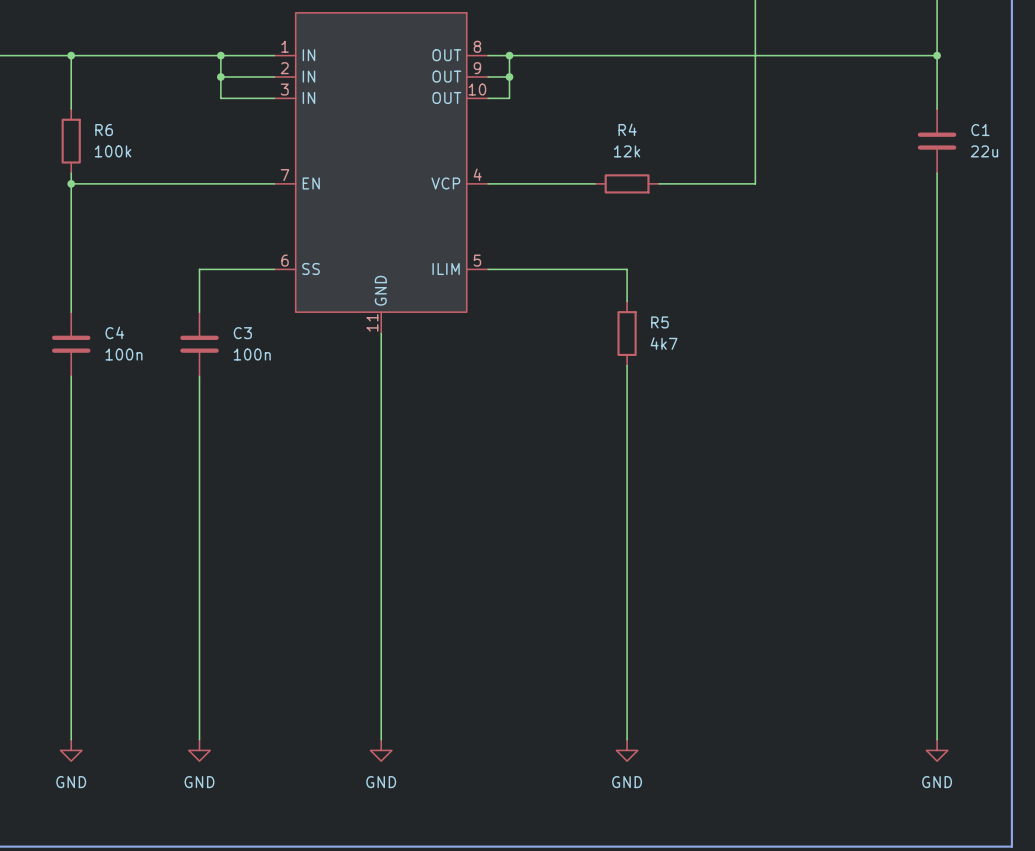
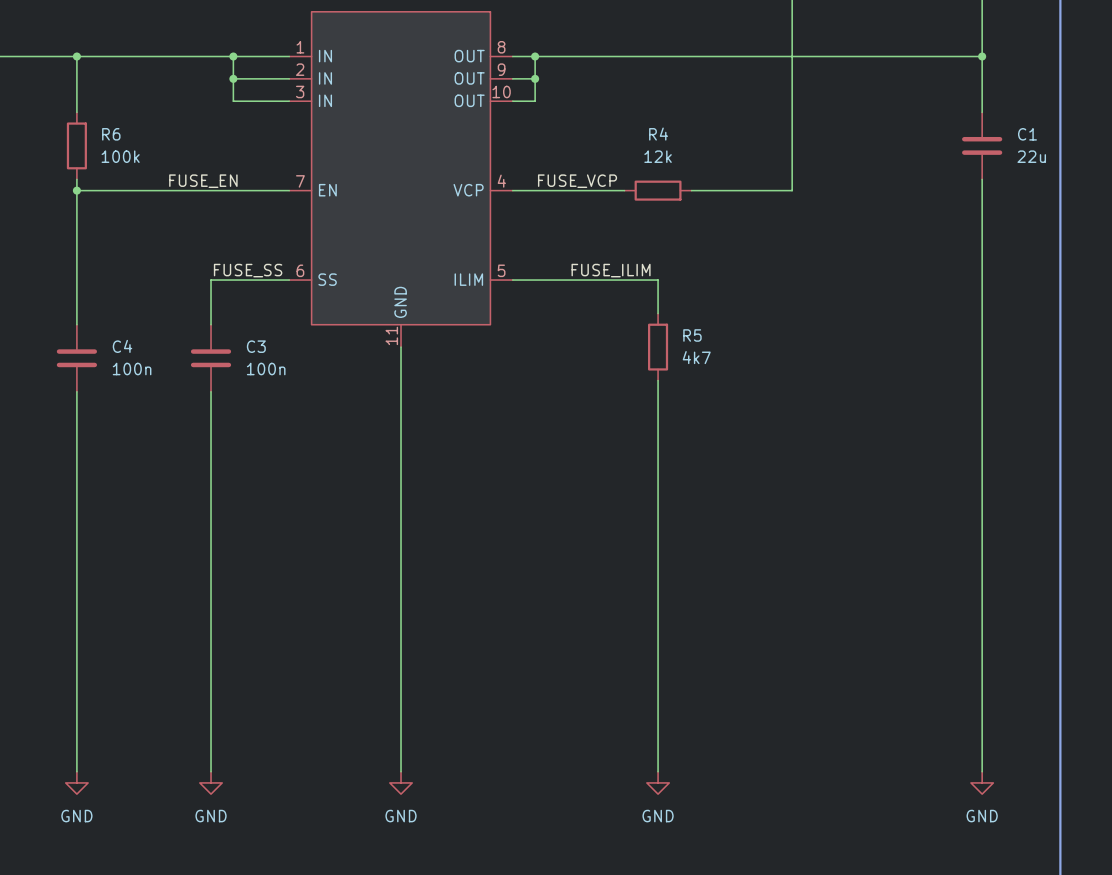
label: none -> FUSE_EN (203, 181)
label: none -> FUSE_VCP (577, 181)
label: none -> FUSE_SS (248, 270)
label: none -> FUSE_ILIM (611, 270)

